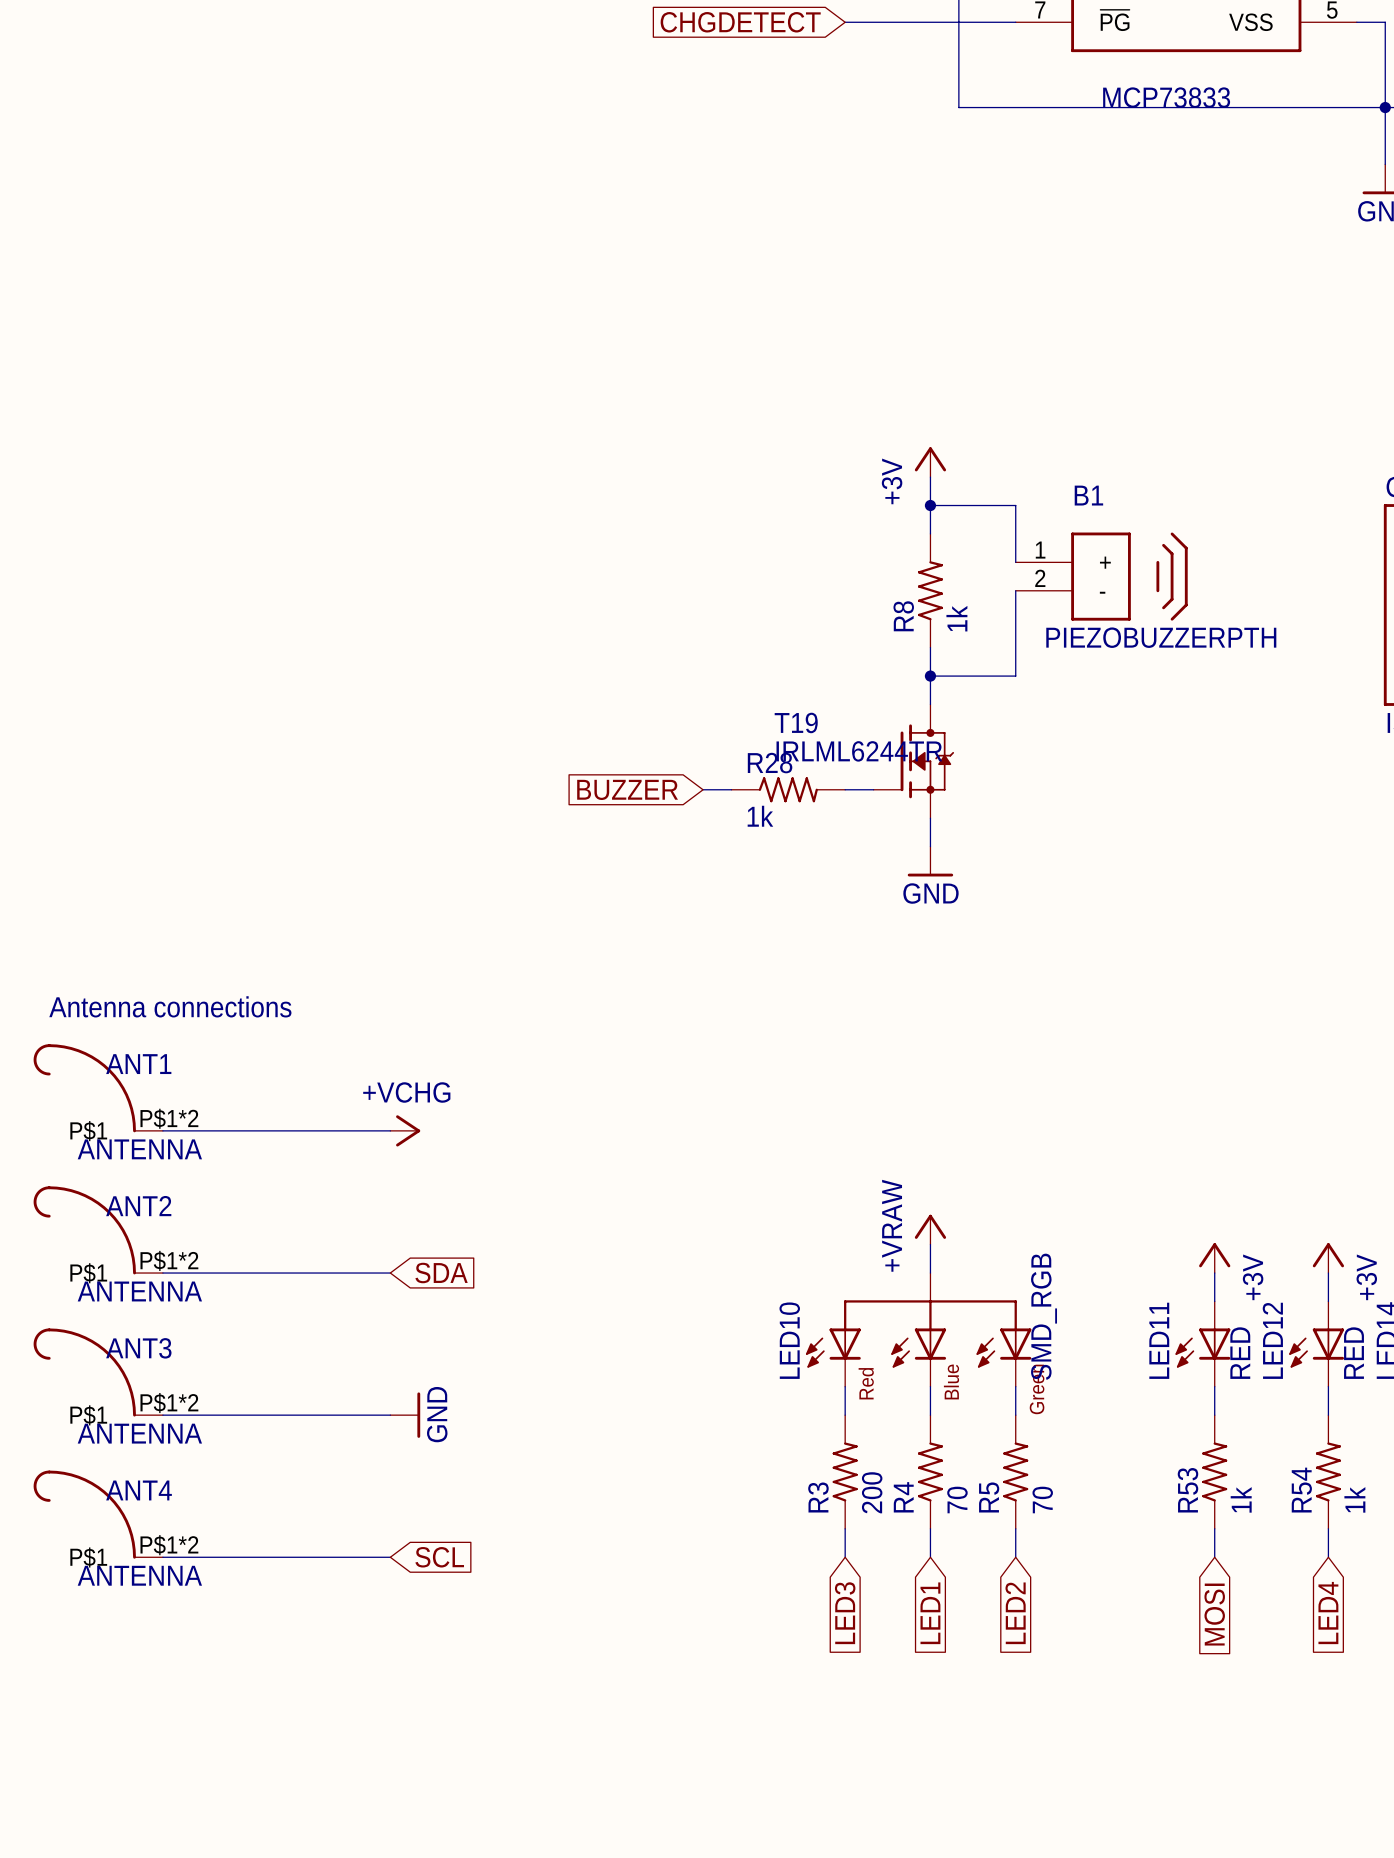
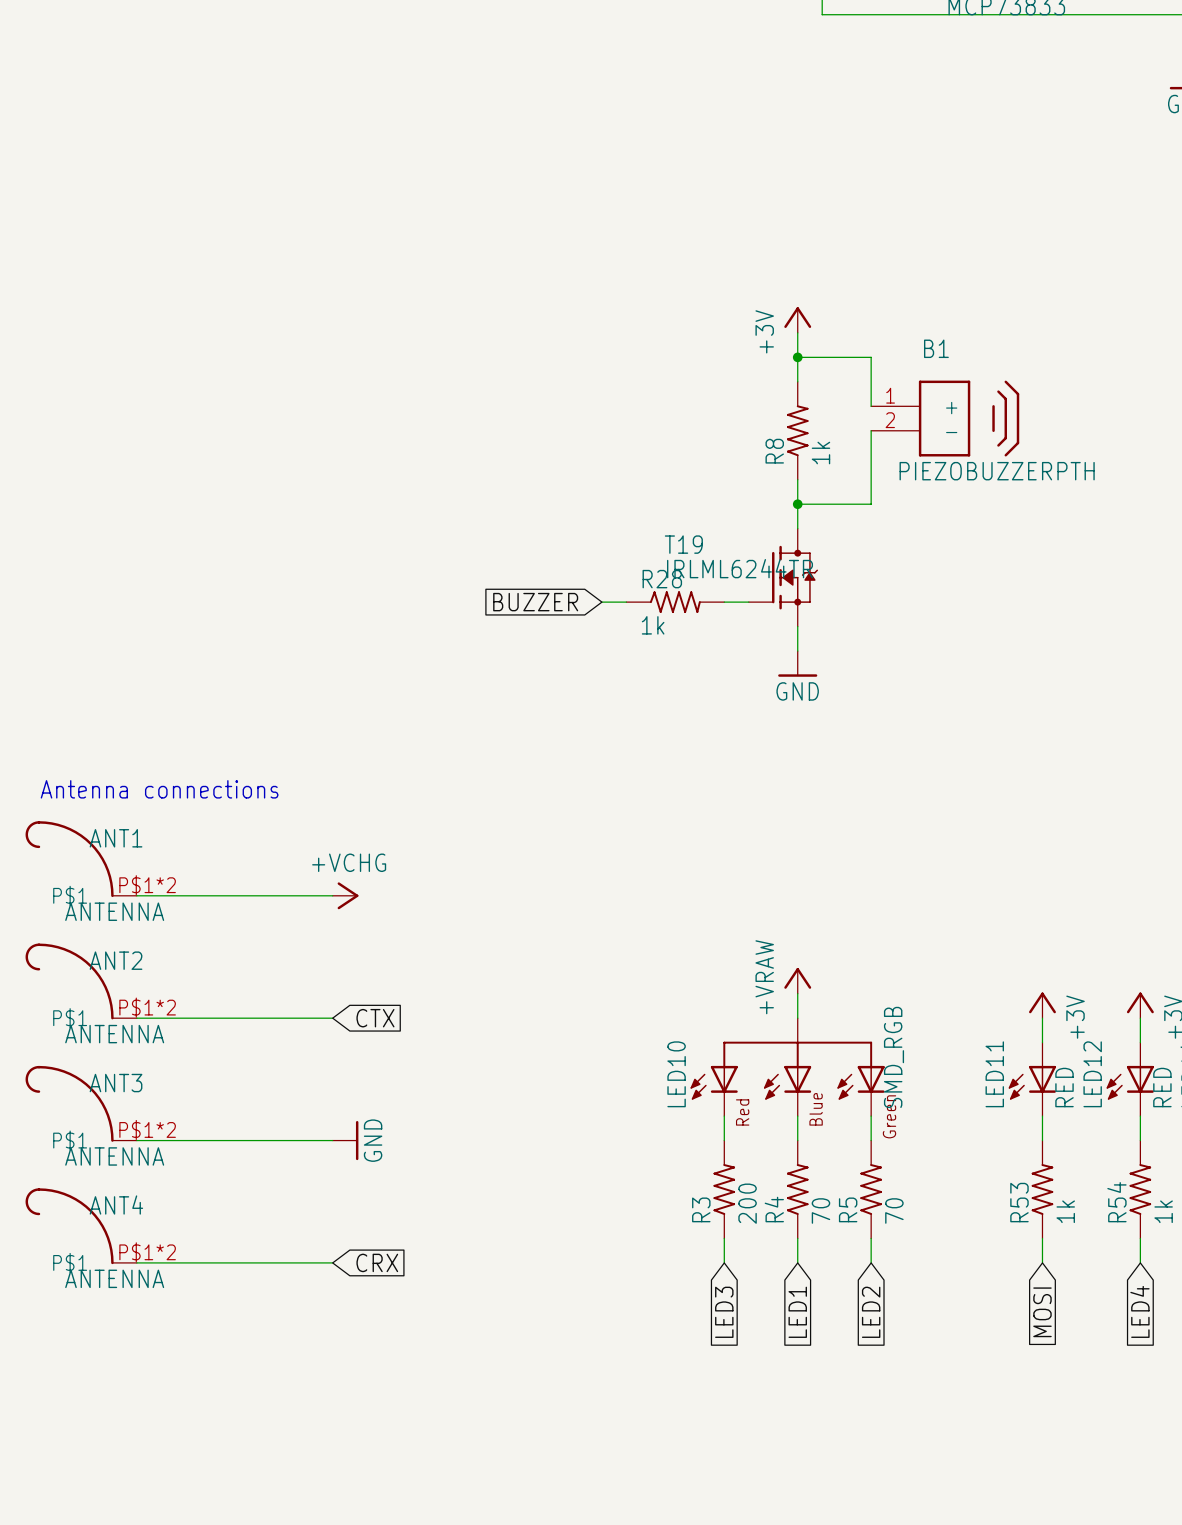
global label: SDA (441, 1273) -> CTX (375, 1018)
global label: SCL (439, 1557) -> CRX (377, 1262)

